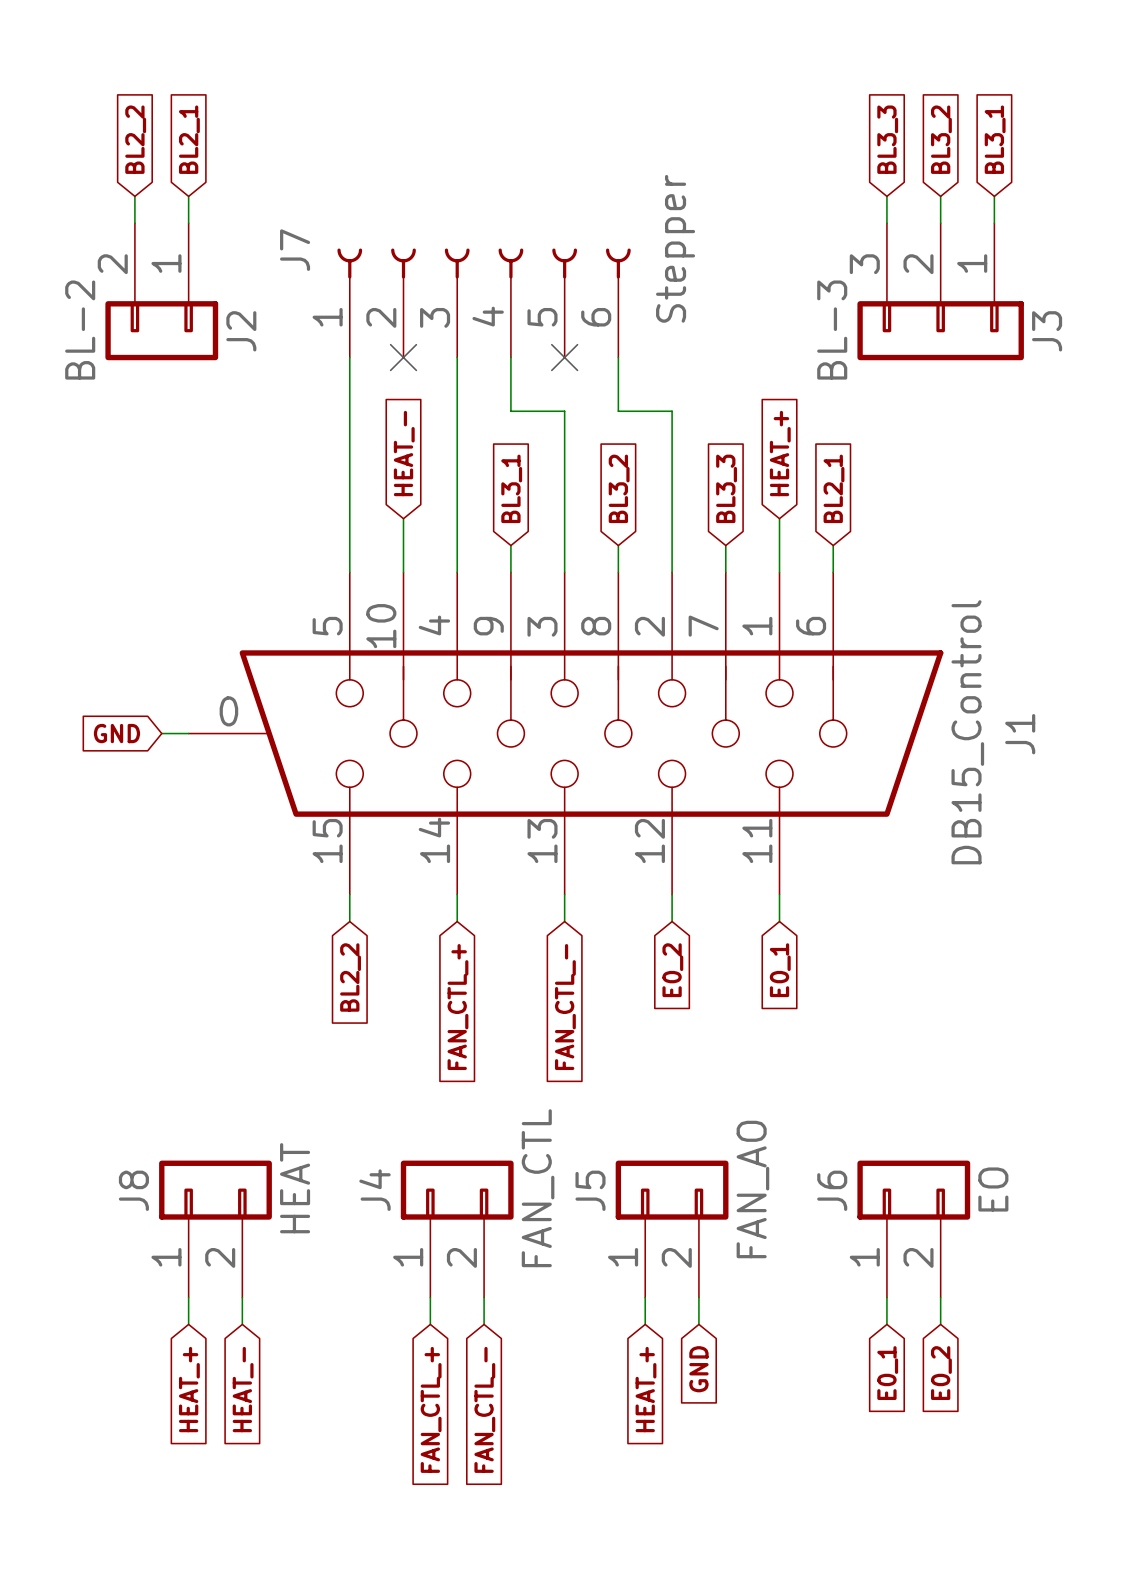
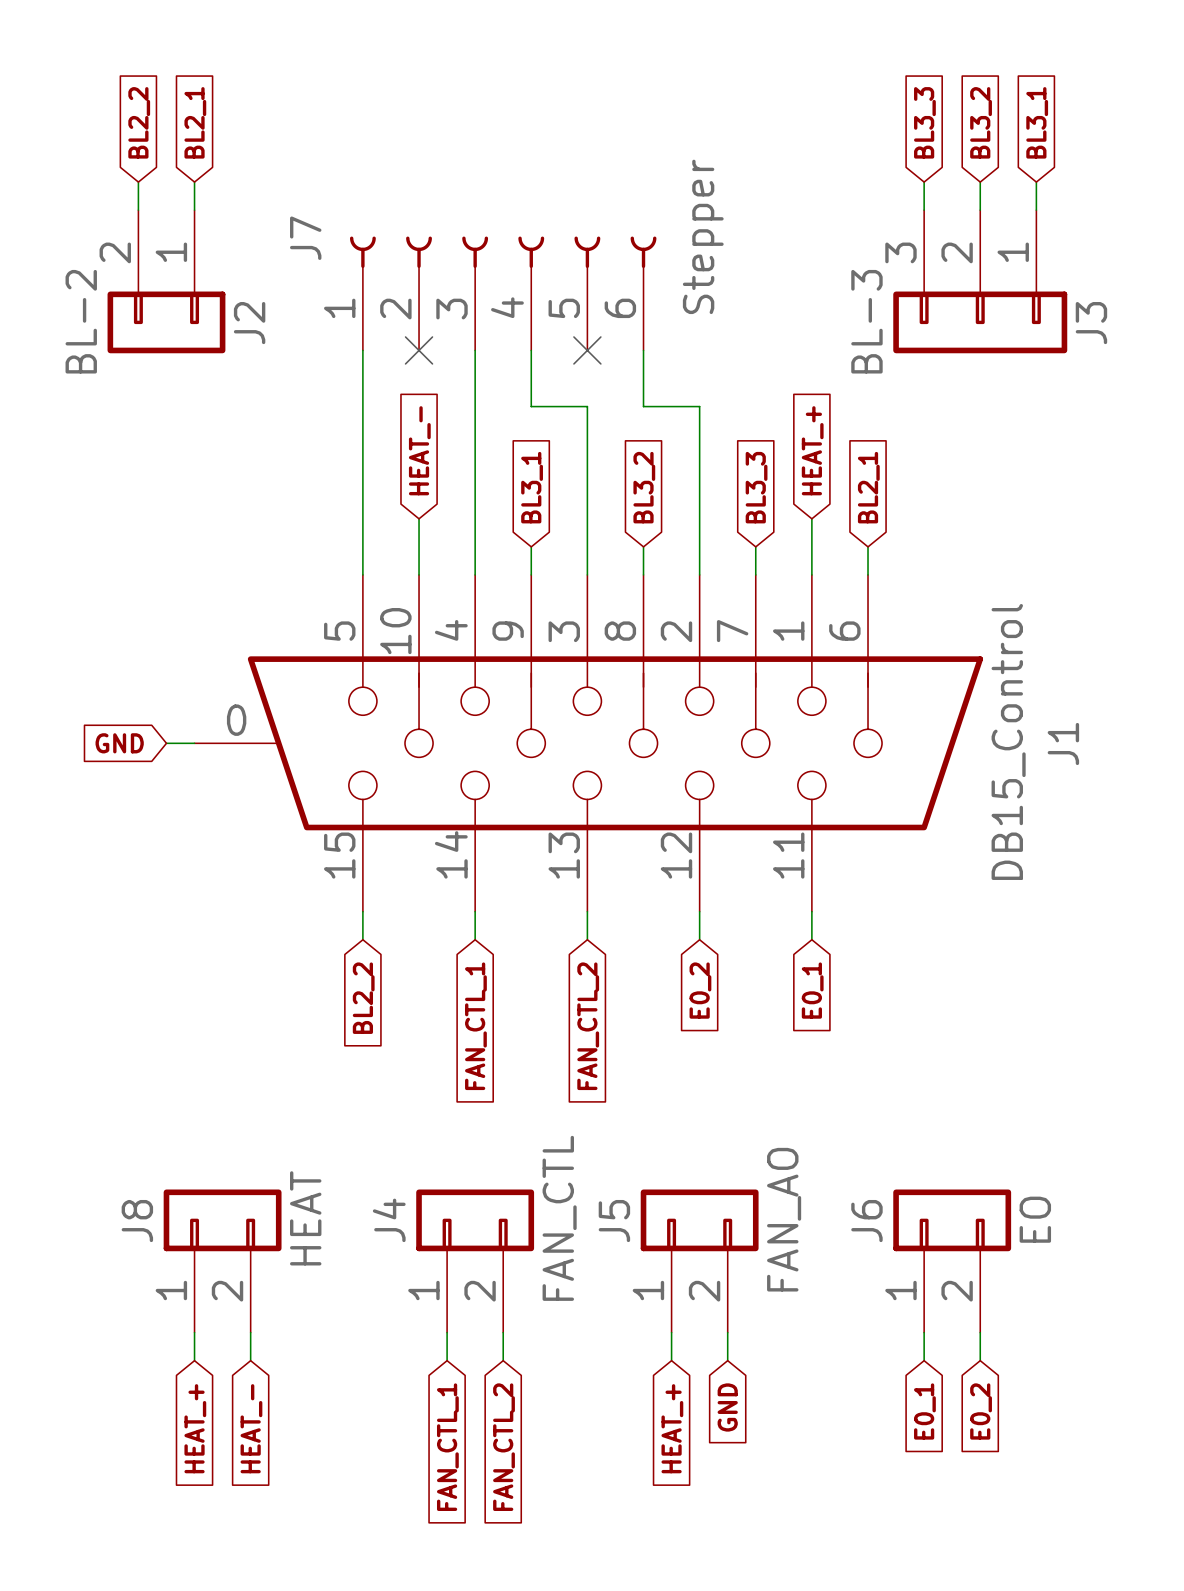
global label: FAN_CTL_+ (457, 1007) -> FAN_CTL_1 (475, 1026)
global label: FAN_CTL_- (565, 1007) -> FAN_CTL_2 (588, 1026)
global label: FAN_CTL_+ (431, 1409) -> FAN_CTL_1 (447, 1447)
global label: FAN_CTL_- (484, 1409) -> FAN_CTL_2 (504, 1447)

